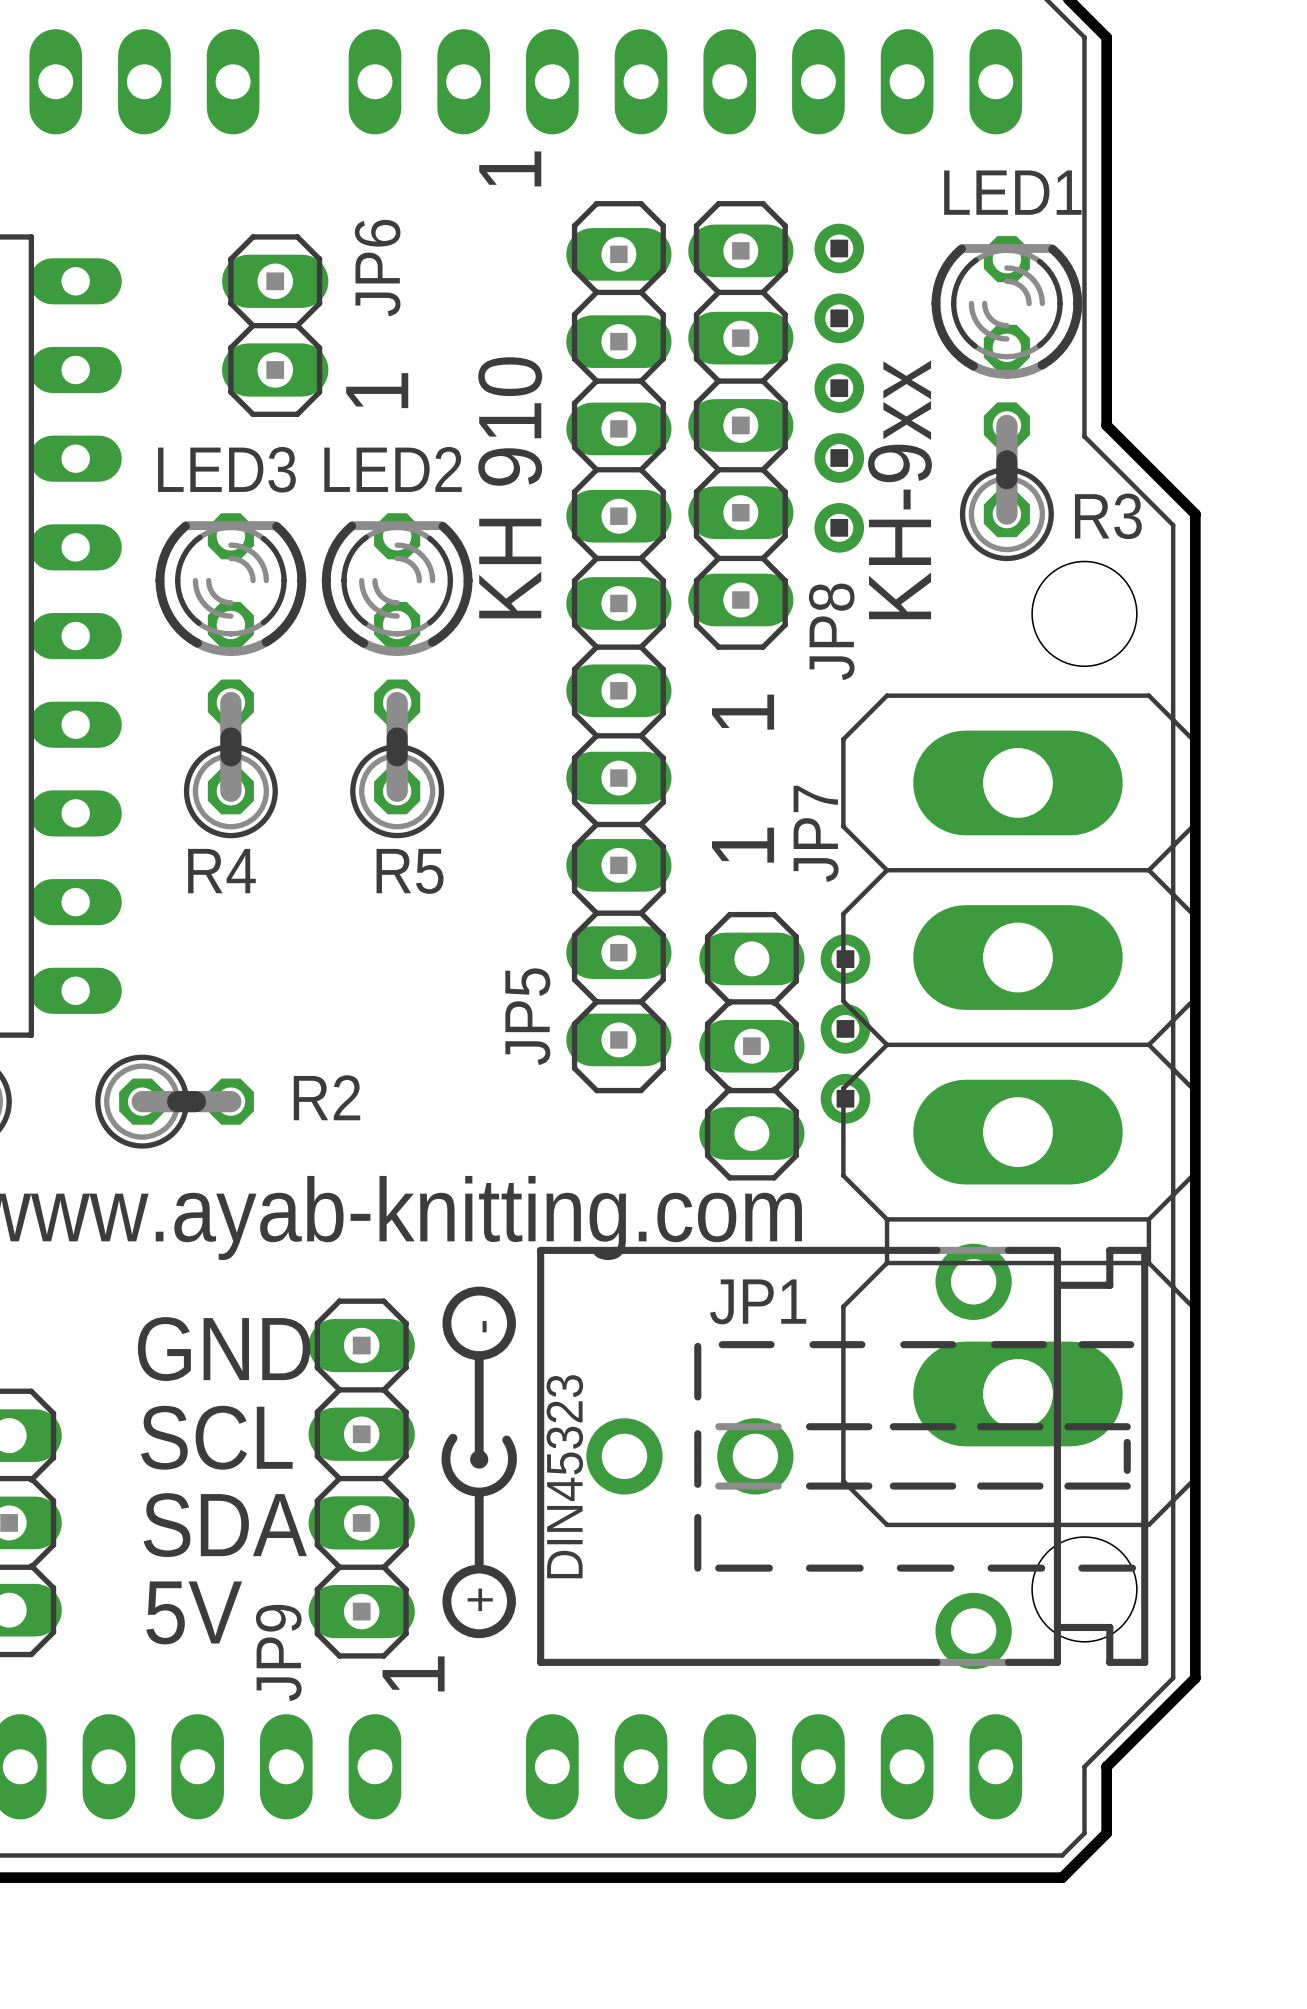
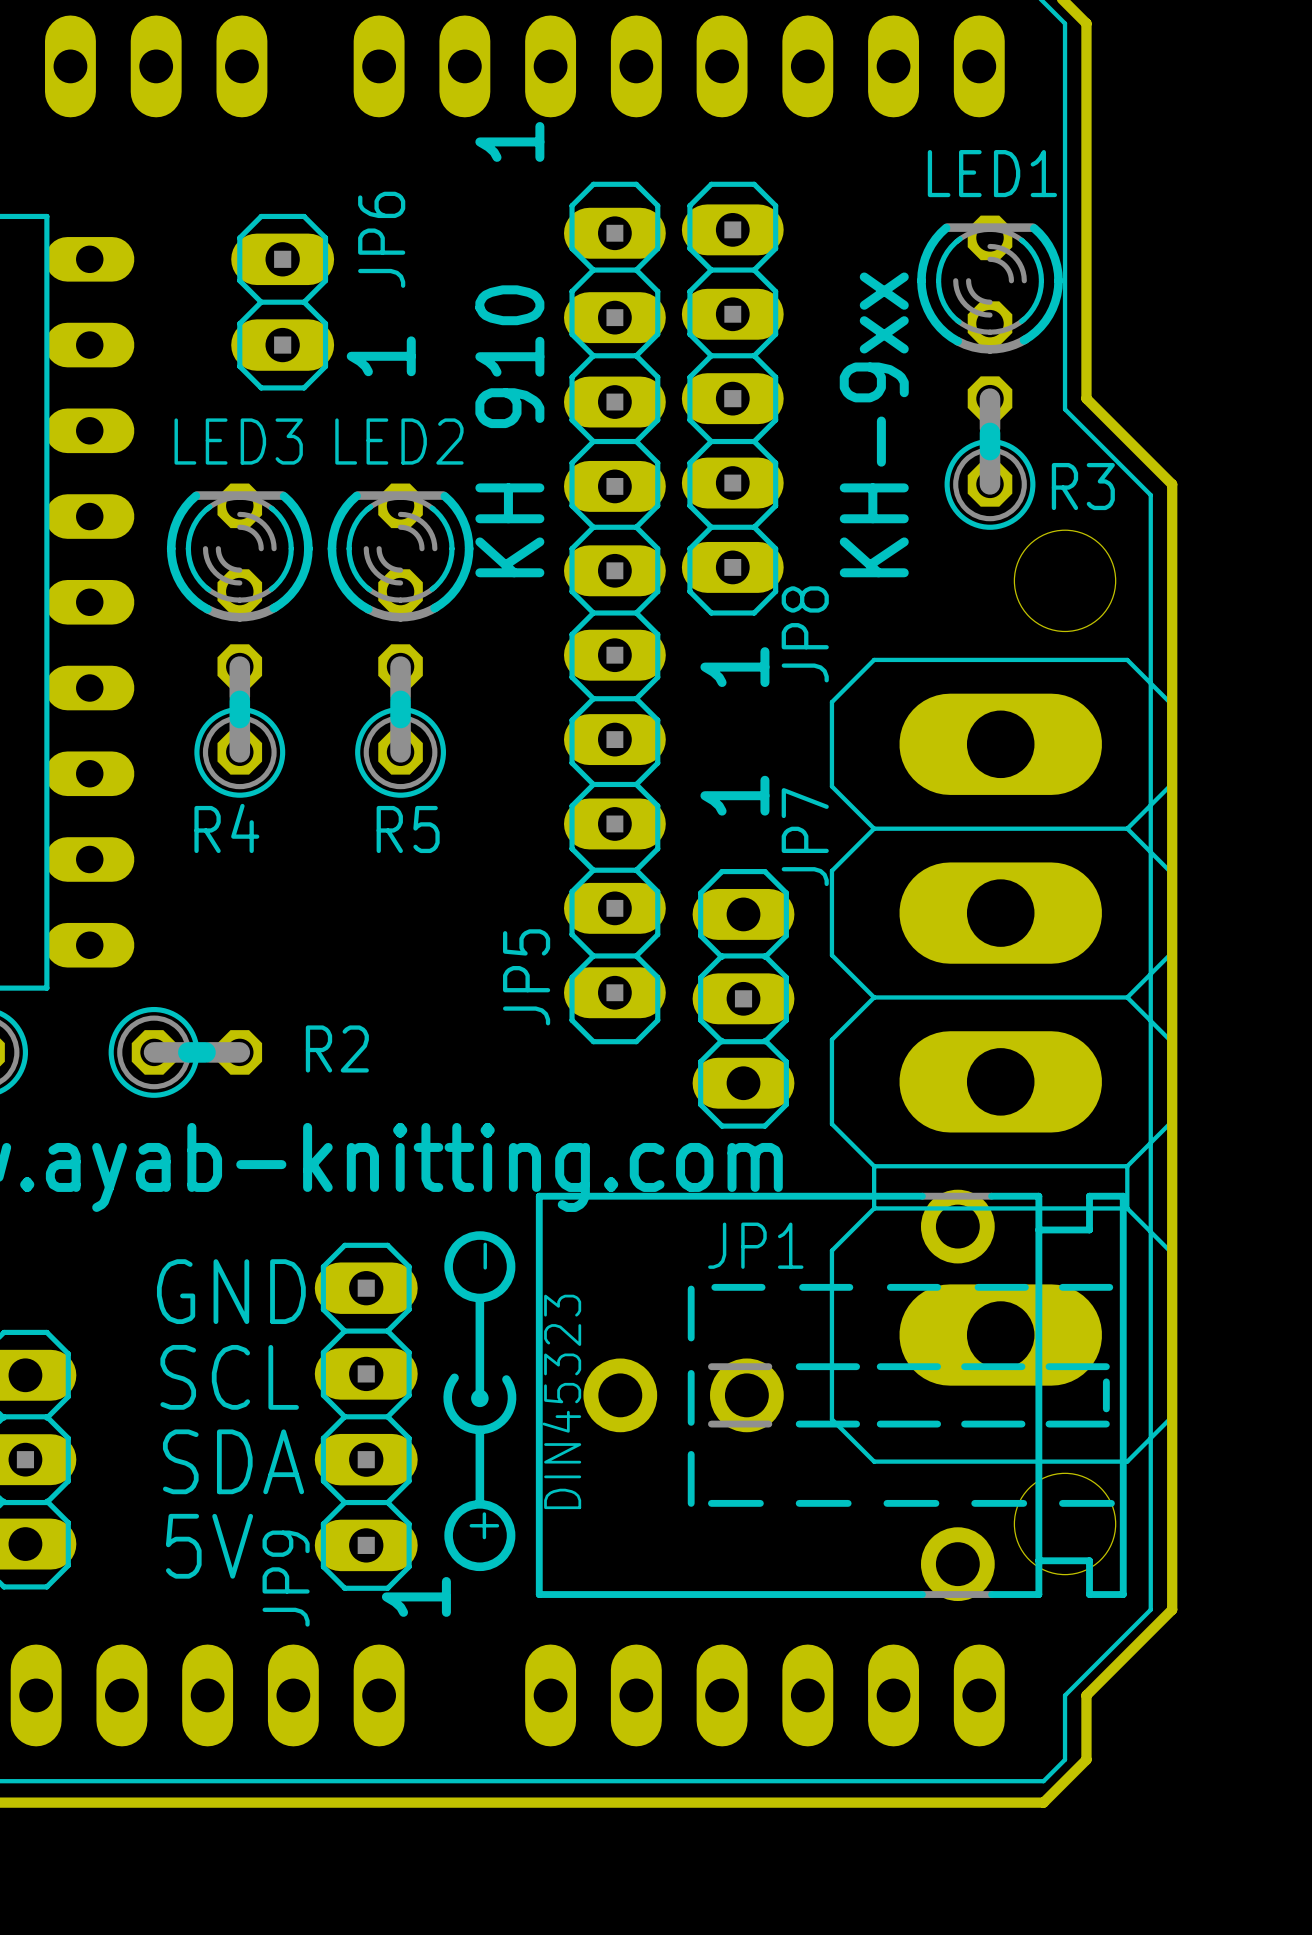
part: (839, 388) -> none
text position: KH-9xx (900, 489) -> KH-9xx (874, 424)
JP8 name position: JP8 (831, 631) -> JP8 (805, 634)
JP7 name position: JP7 (816, 833) -> JP7 (805, 837)
part: (845, 1028) -> none

